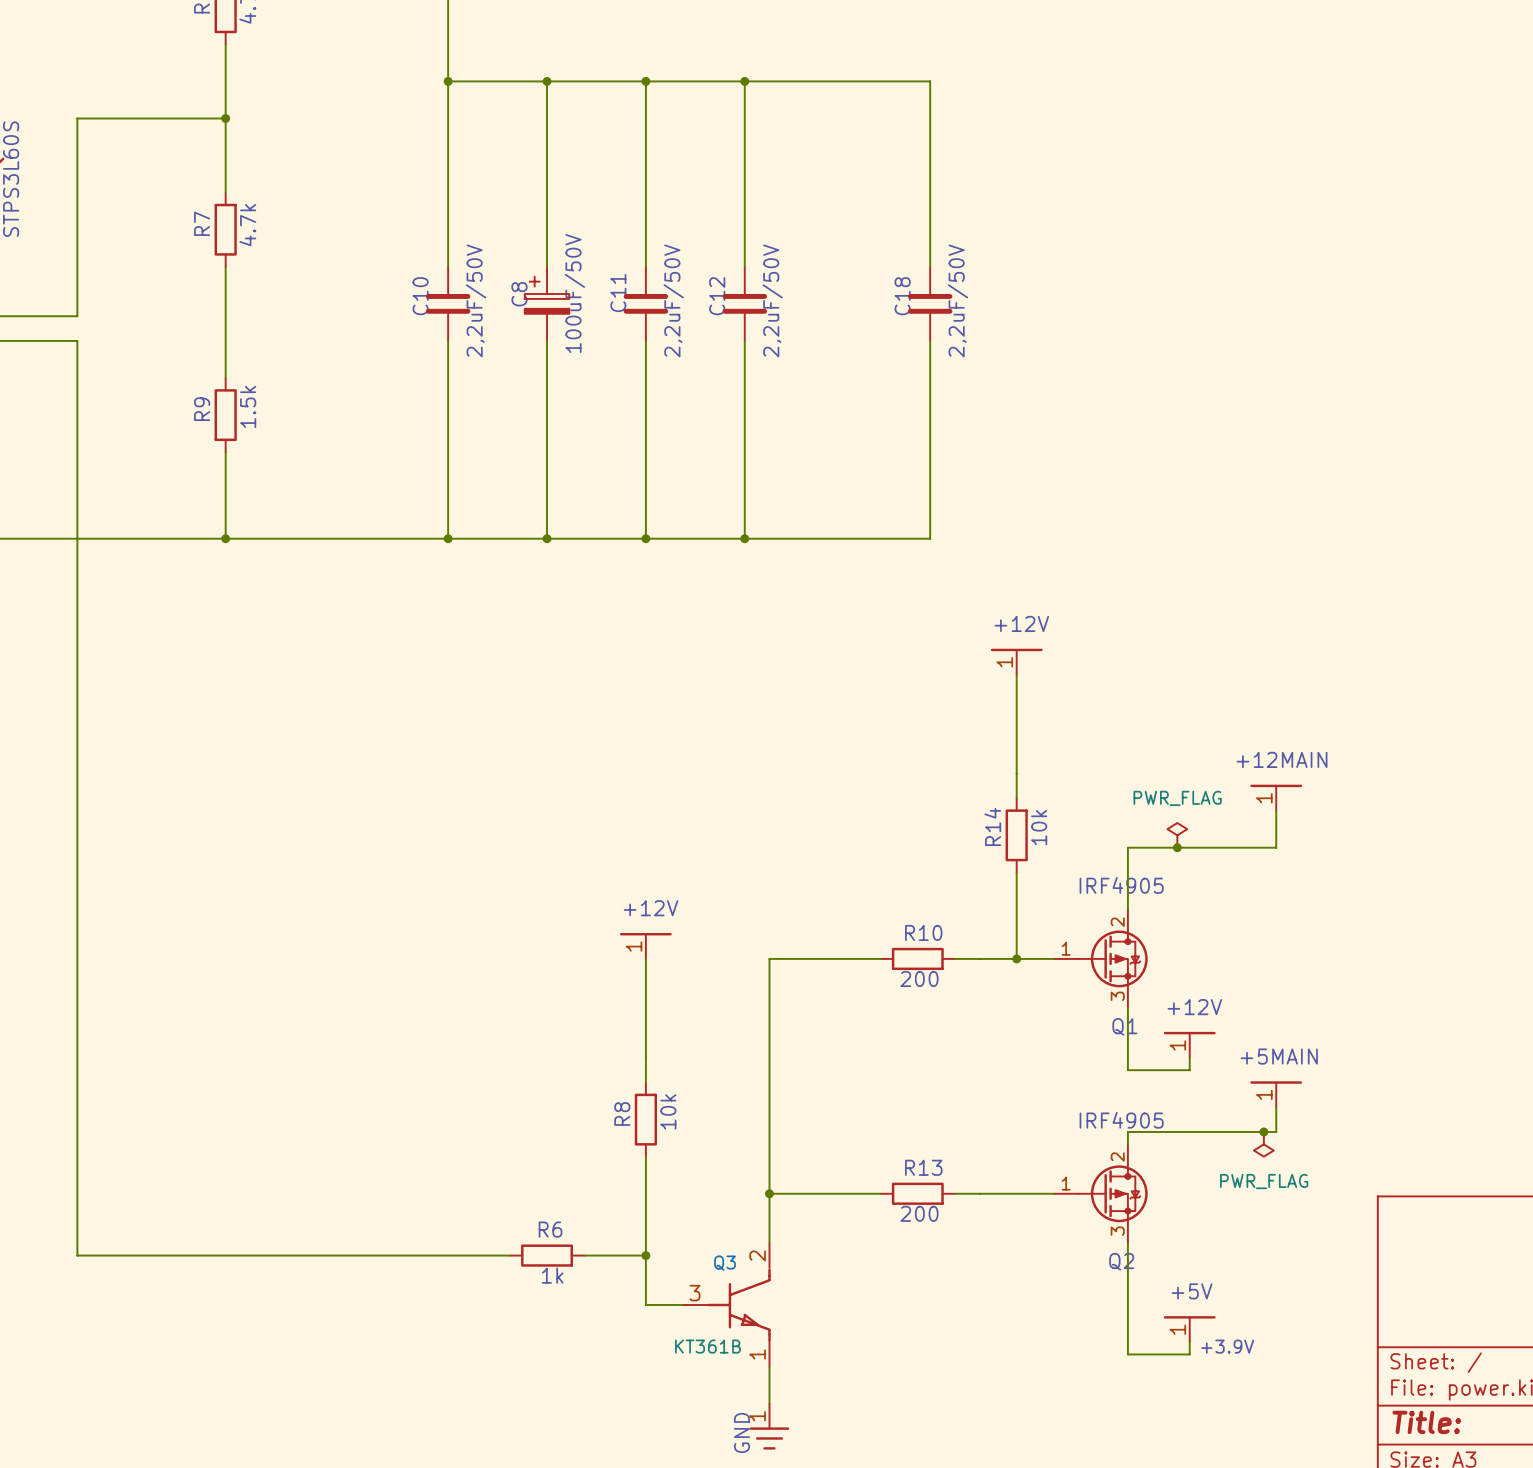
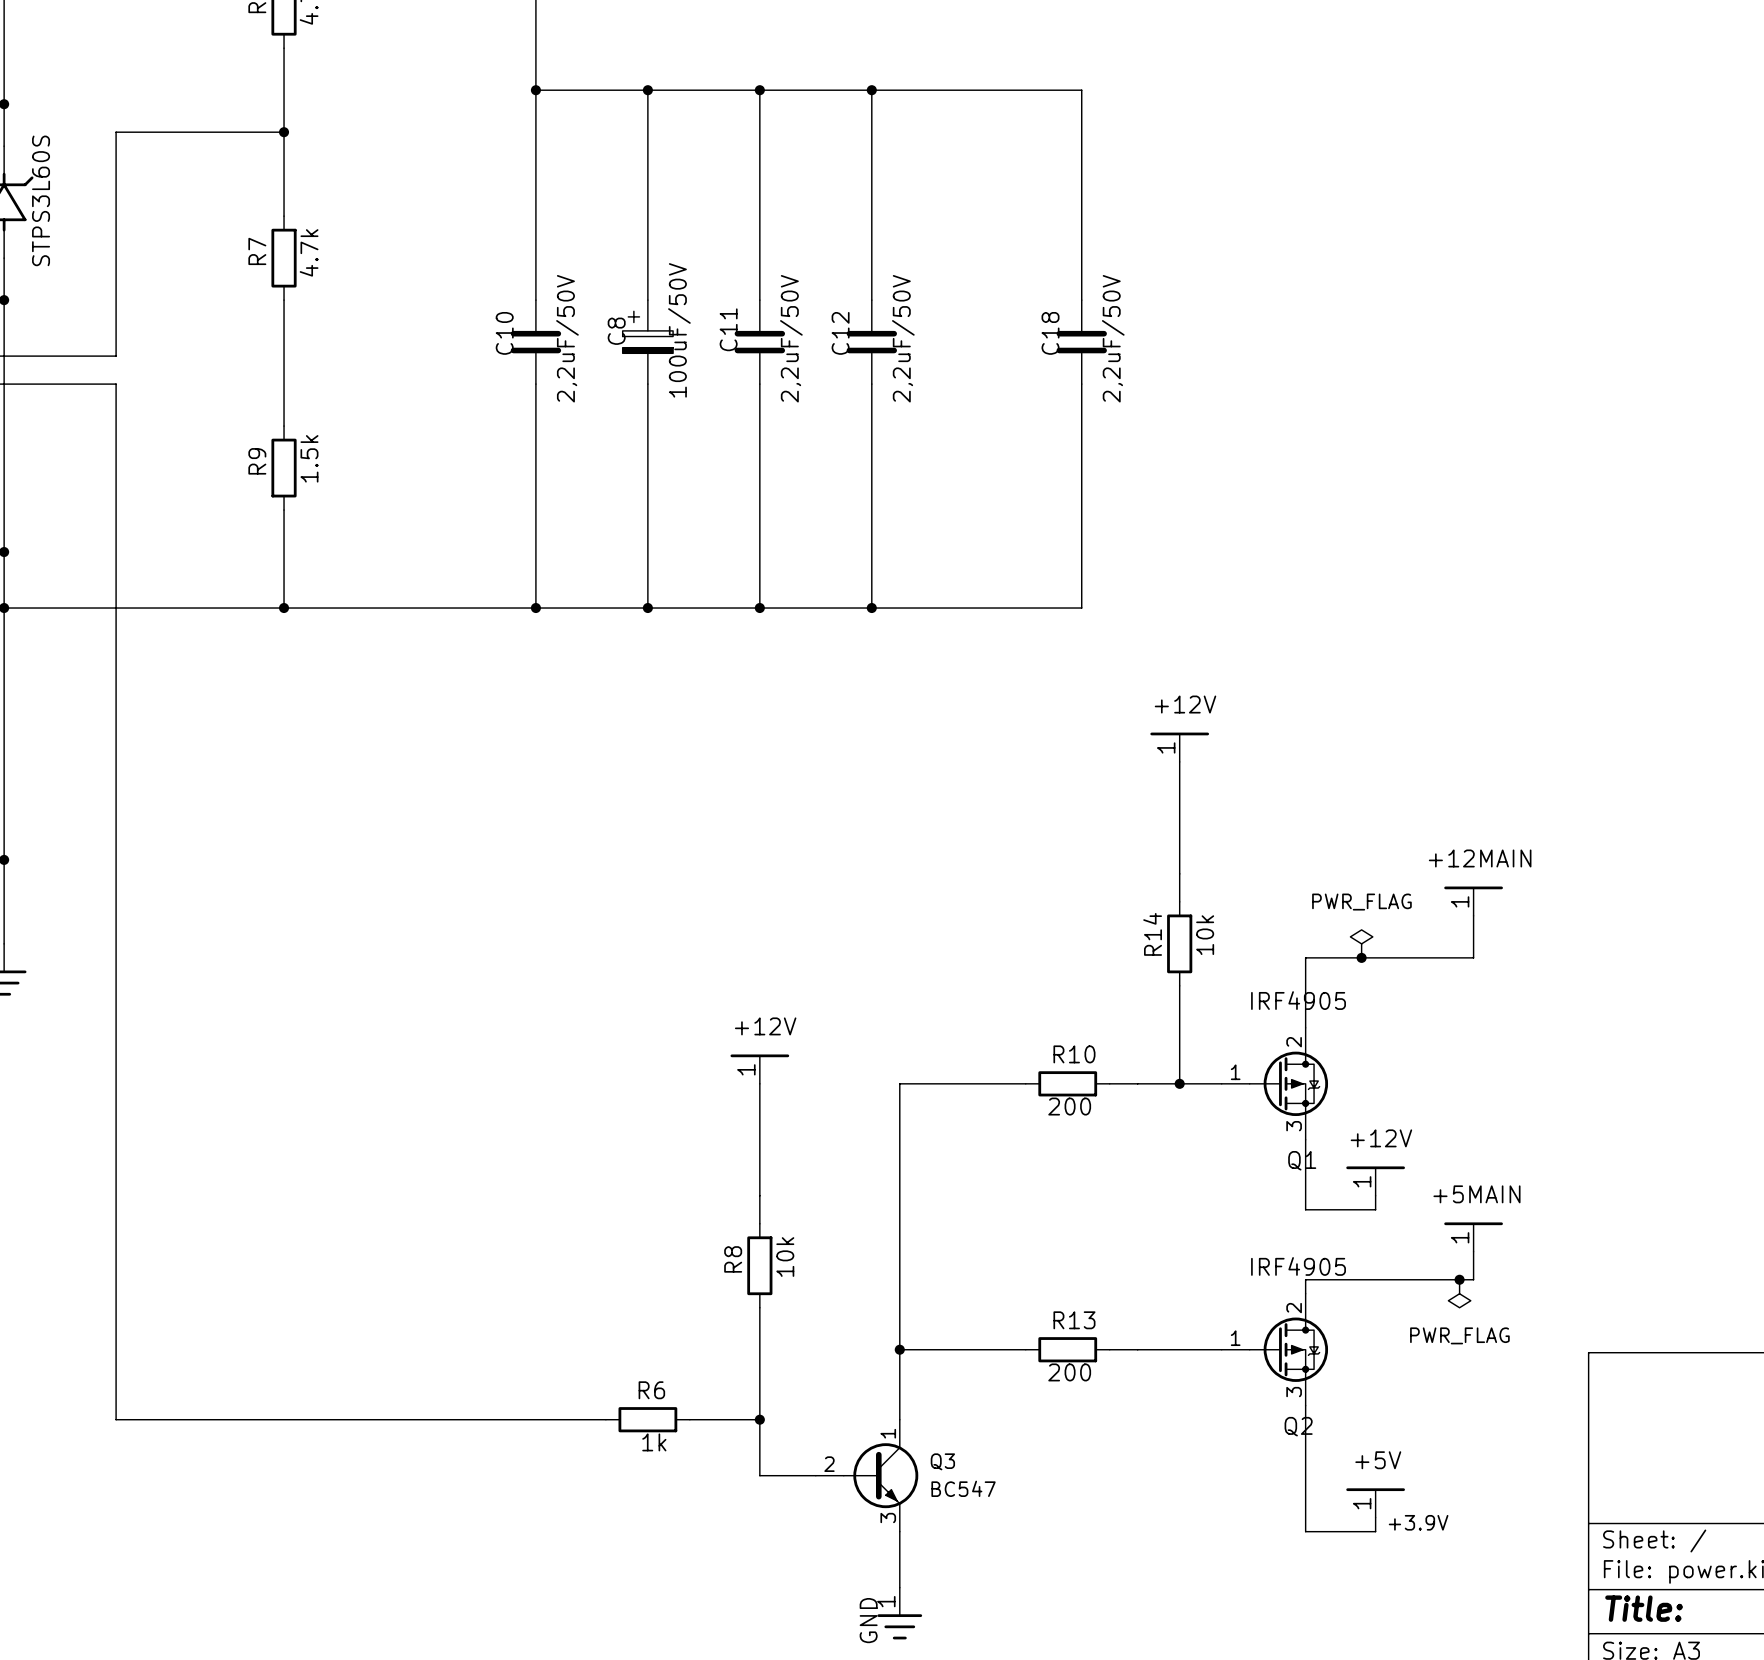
Q3 symbol: [682, 1243, 771, 1367] -> [815, 1419, 919, 1532]
Q3 name position: Q3 (724, 1263) -> Q3 (942, 1461)
Q3 value: КТ361В (707, 1346) -> BC547 (963, 1488)

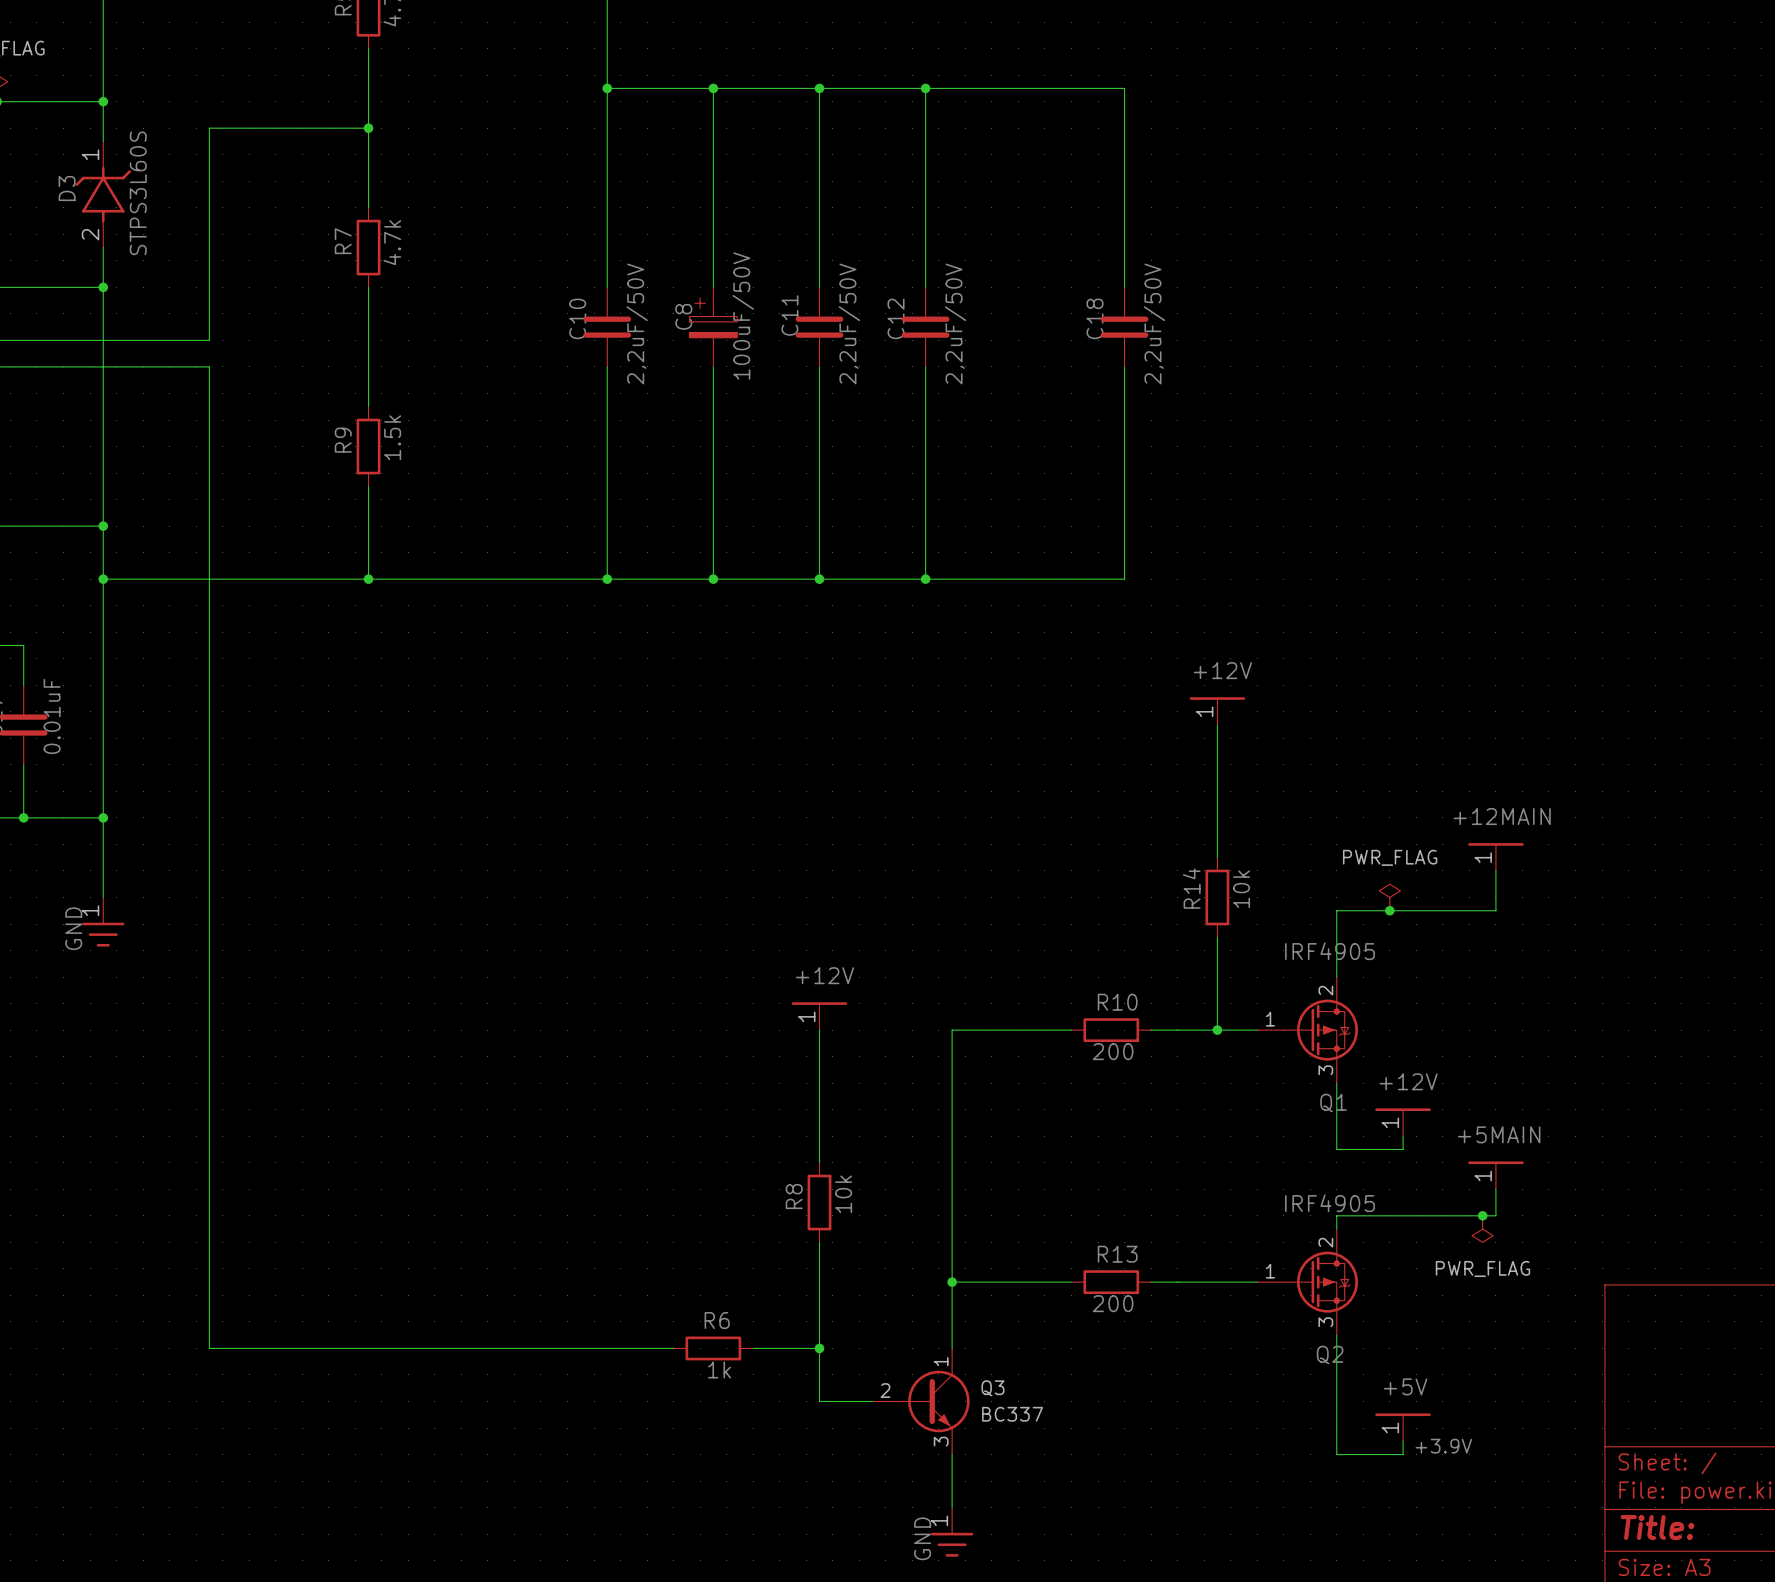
Q3 value: BC547 (963, 1488) -> BC337 (1012, 1414)

